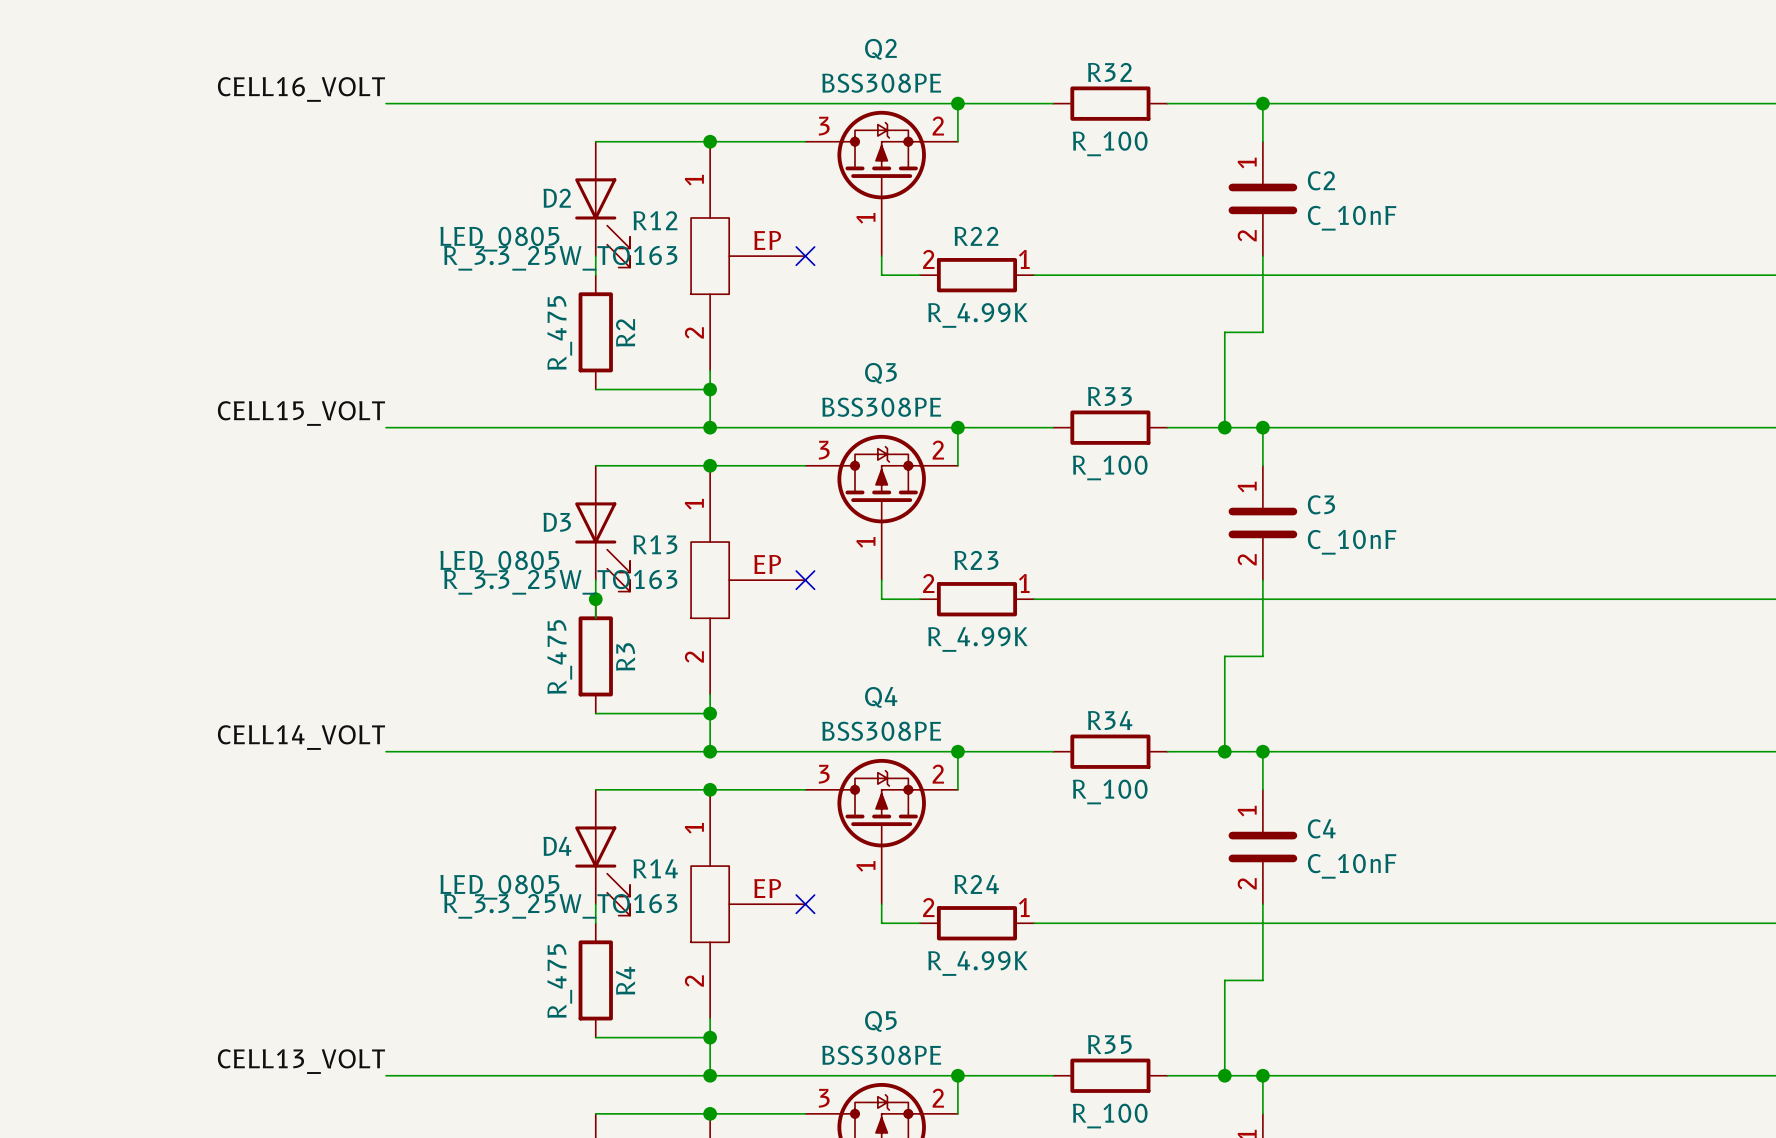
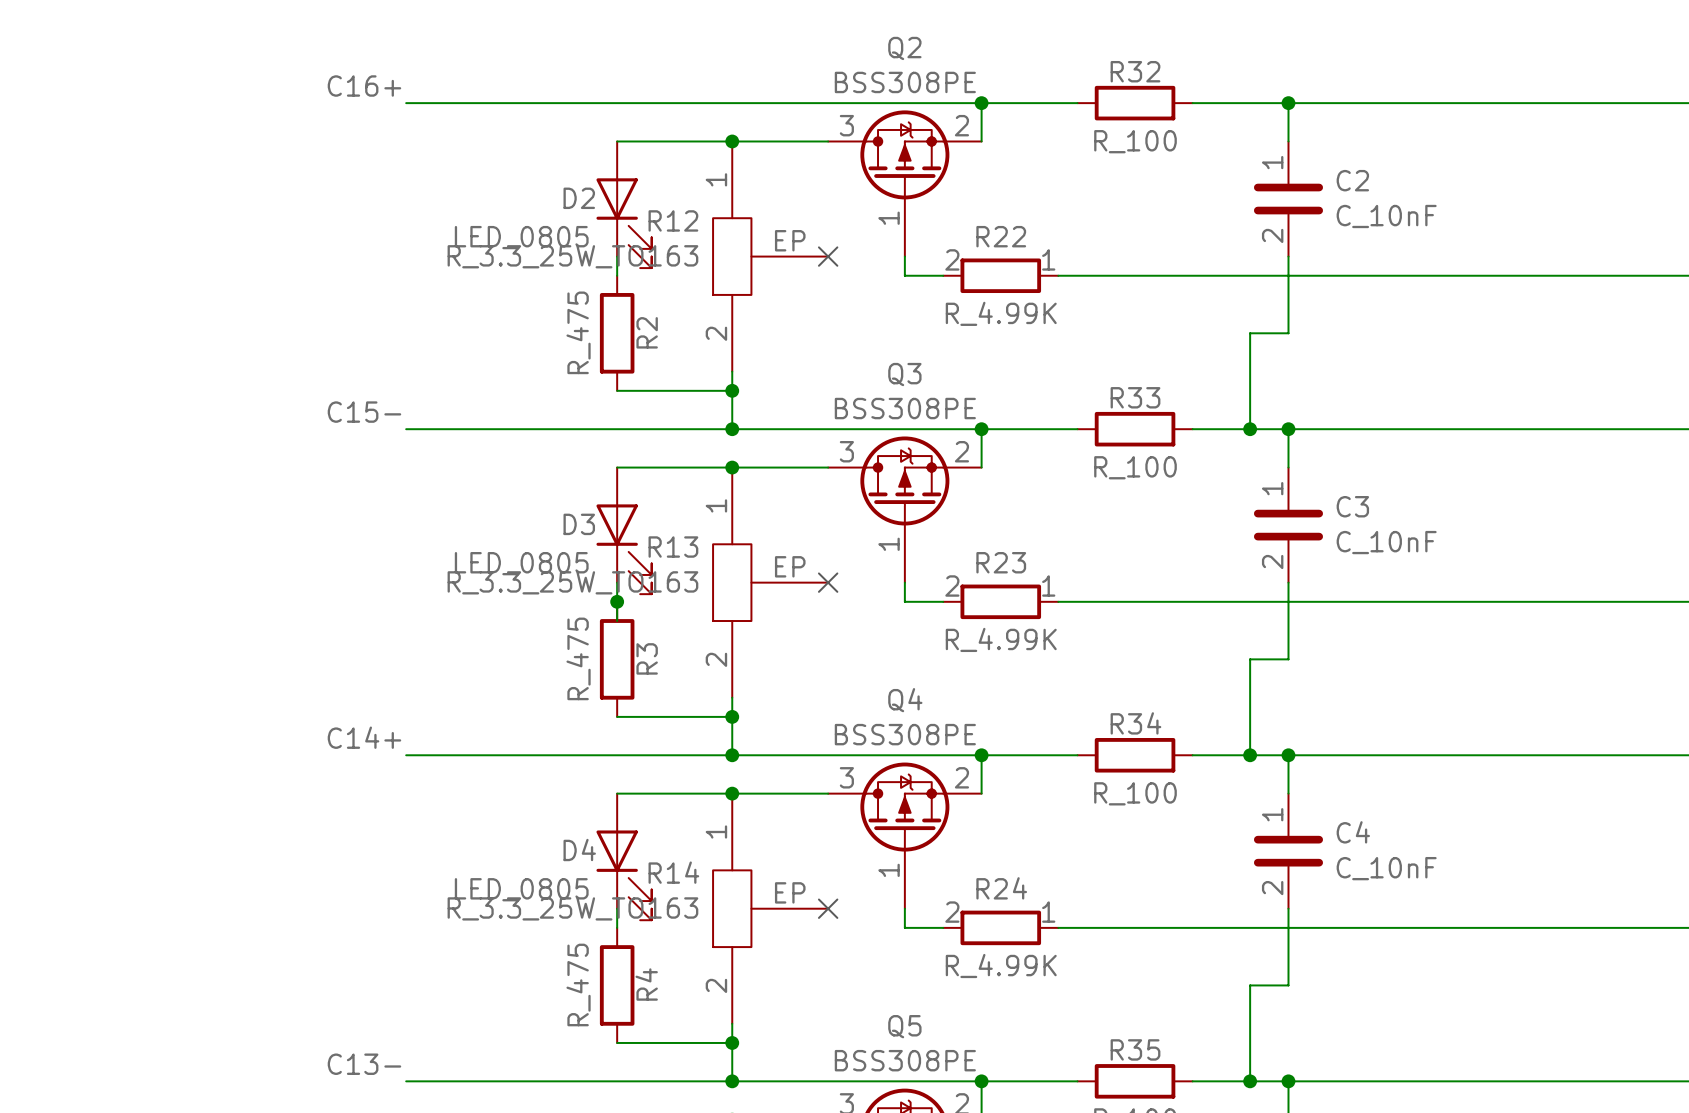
label: CELL16_VOLT (301, 89) -> C16+ (364, 86)
label: CELL15_VOLT (301, 413) -> C15- (364, 412)
label: CELL14_VOLT (301, 737) -> C14+ (364, 737)
label: CELL13_VOLT (301, 1061) -> C13- (364, 1064)

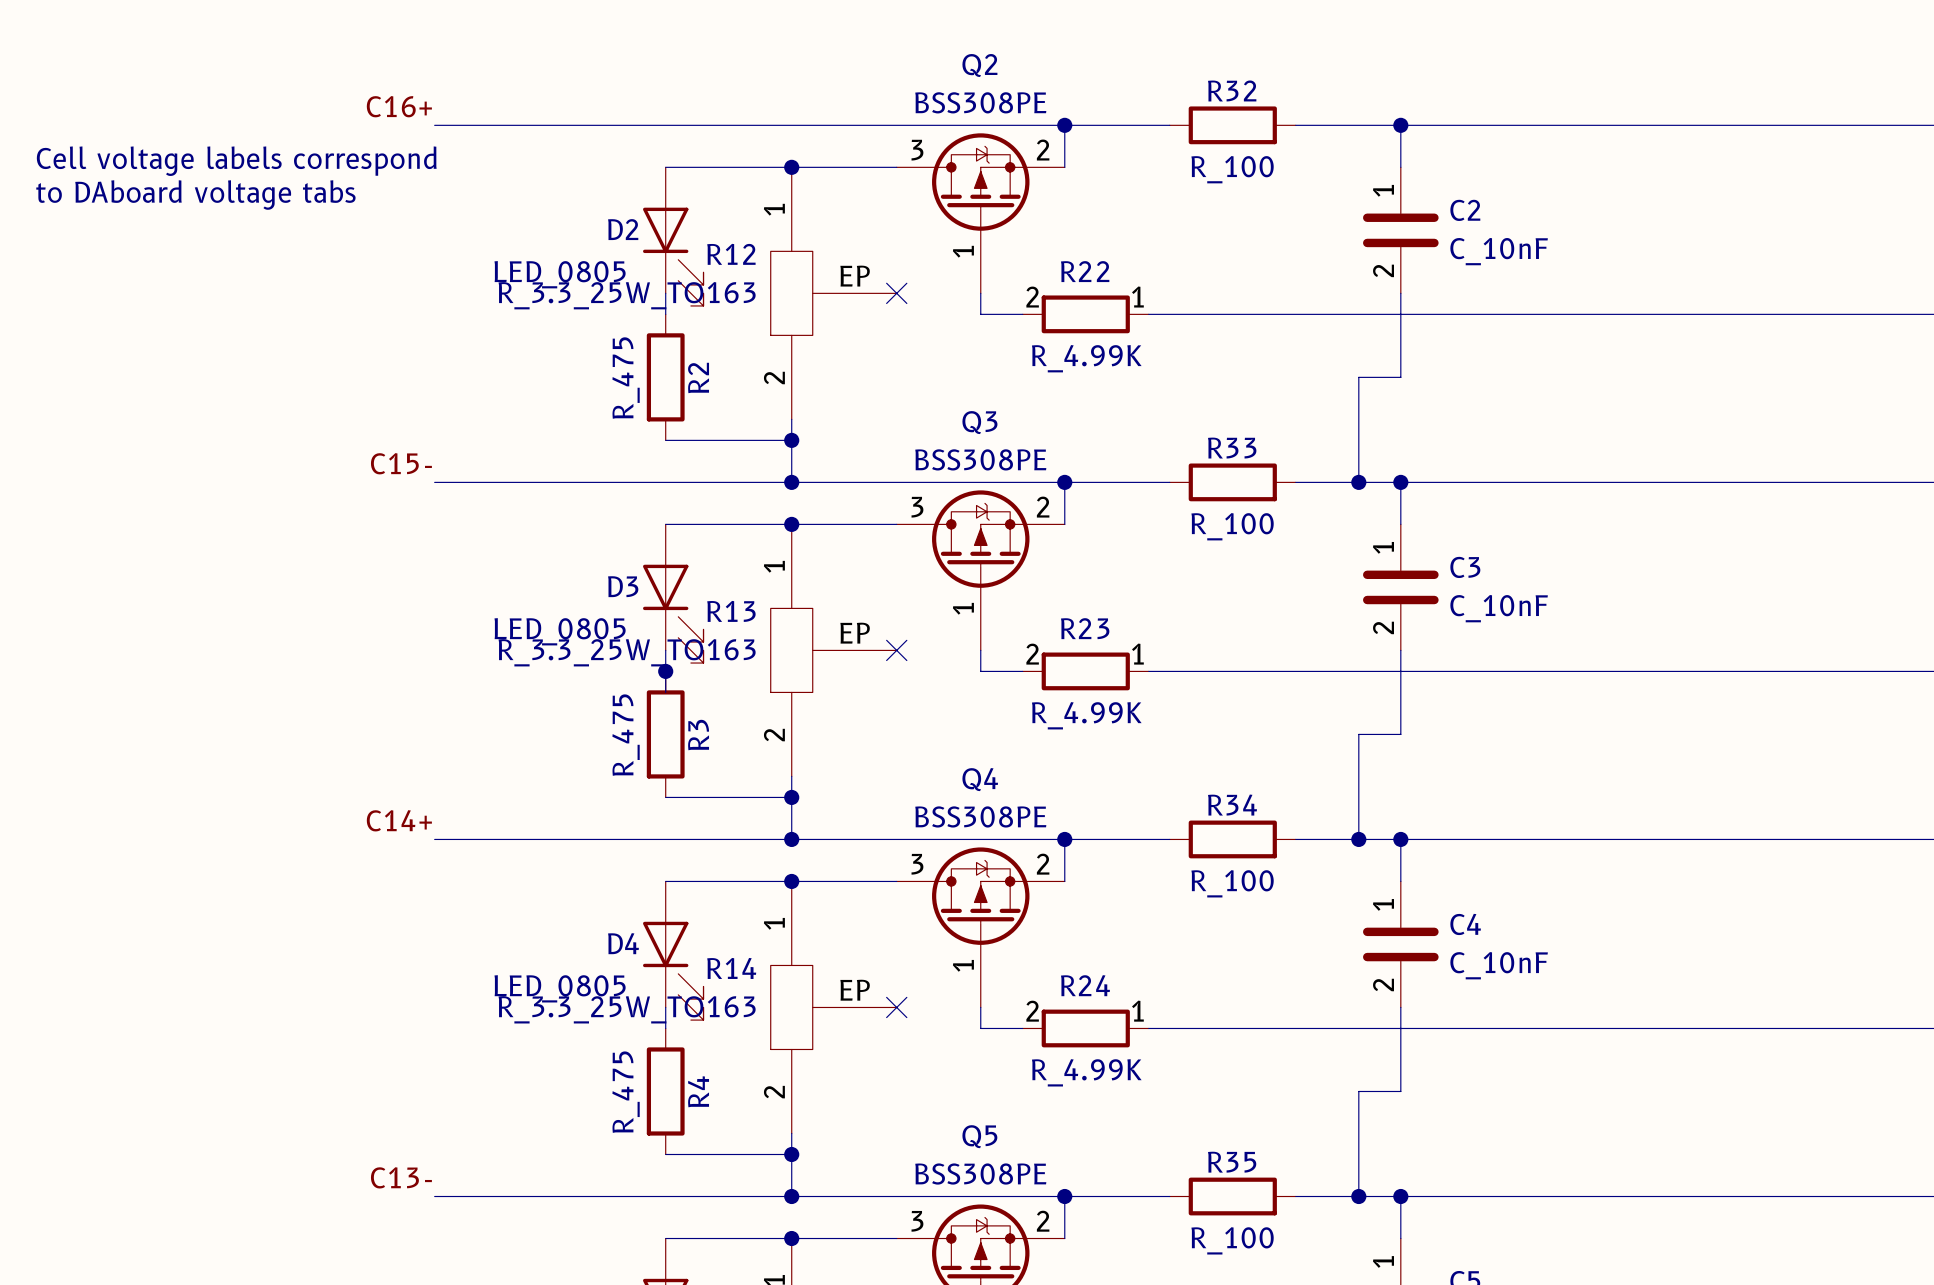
text: none -> Cell voltage labels correspond (236, 161)
text: none -> to DAboard voltage tabs (195, 195)

